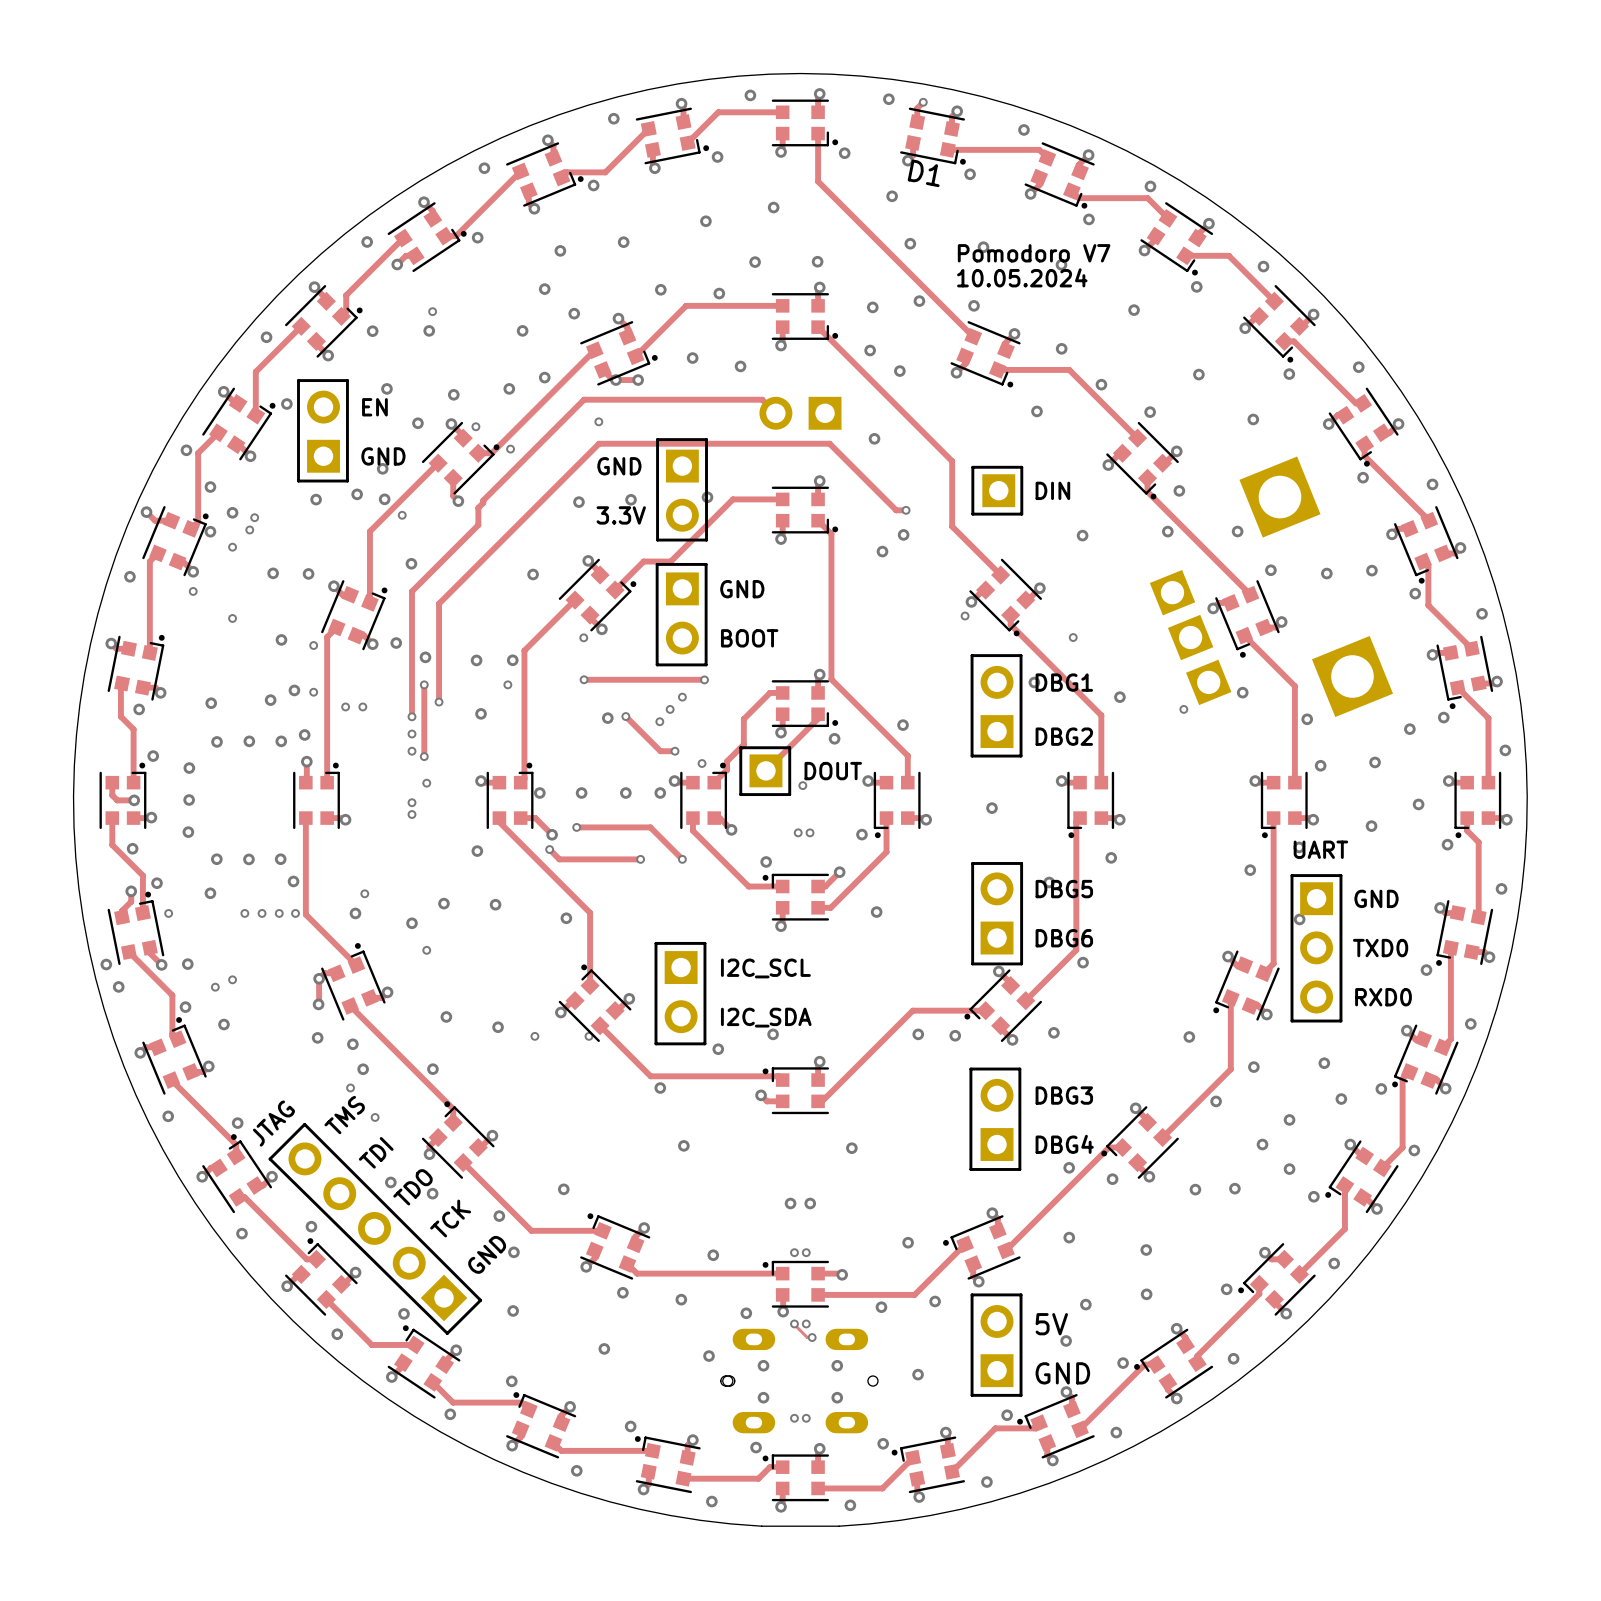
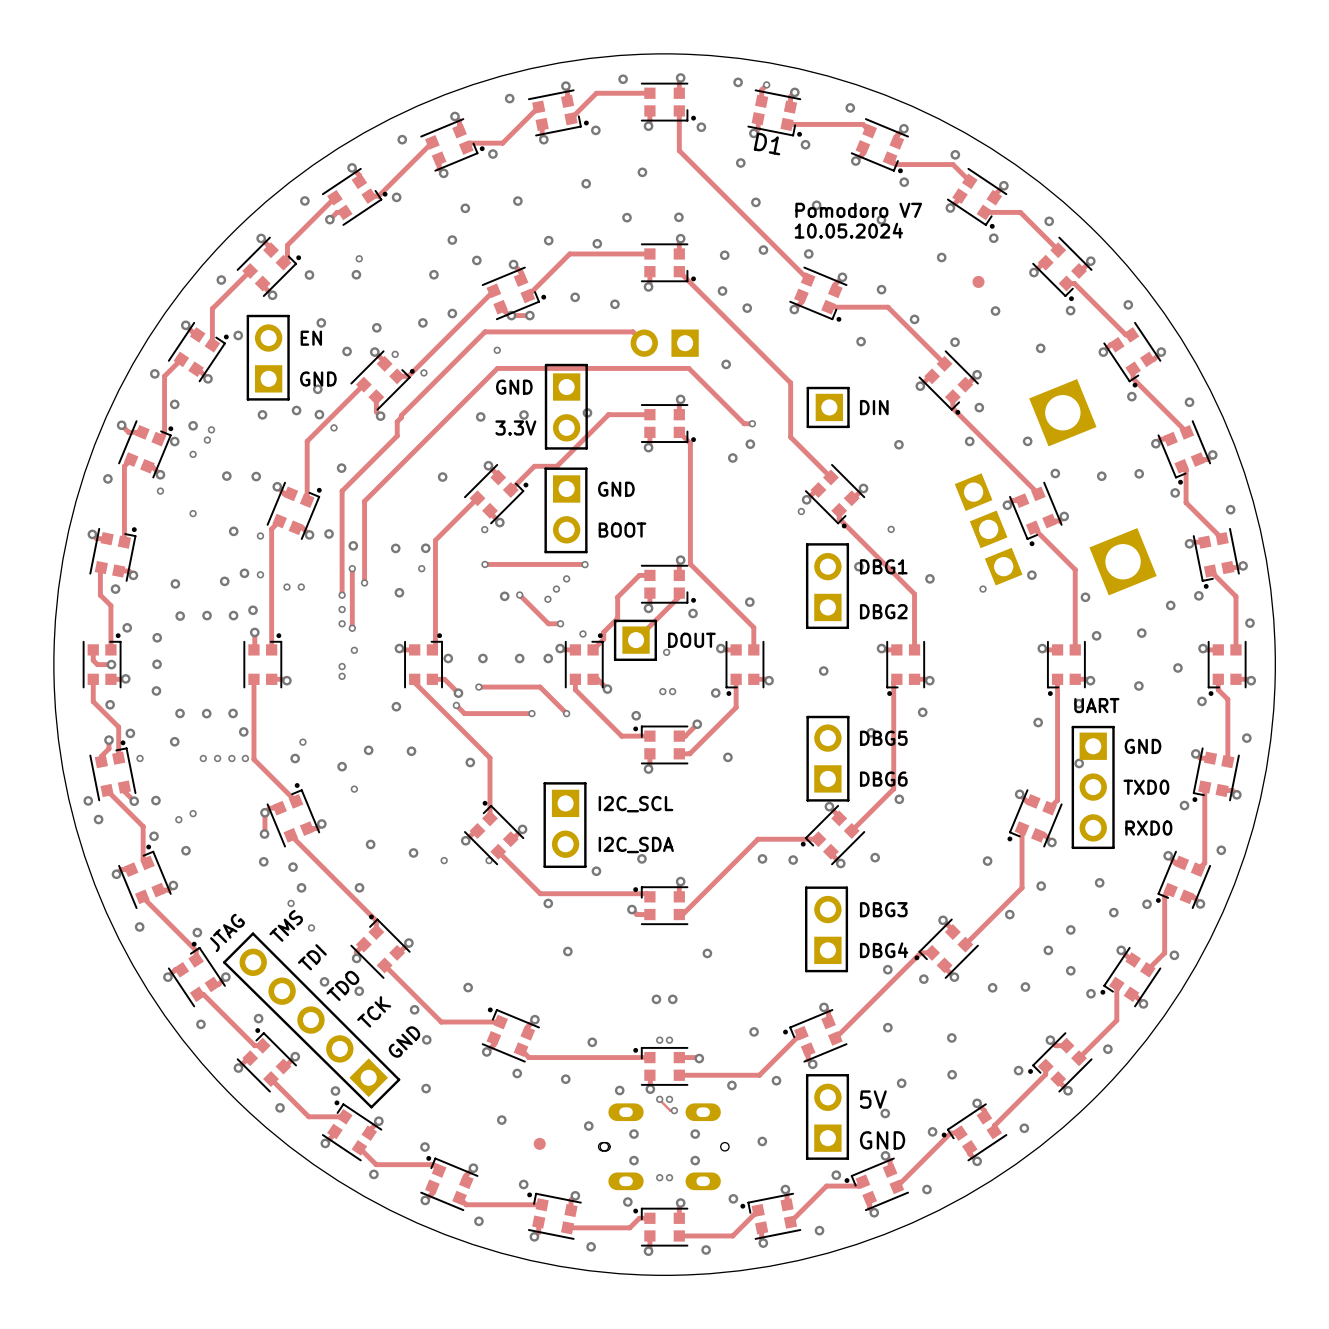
round board edge: none -> [53, 53, 1276, 1276]
part: none -> (978, 281)
part: none -> (539, 1143)
board edge: (761, 1526) (839, 1526) (900, 1520) (960, 1509) (1049, 1483) (1106, 1459) (1187, 1415) (1237, 1380) (1285, 1341) (1349, 1276) (1388, 1228) (1422, 1176) (1451, 1122) (1487, 1037) (1504, 979) (1521, 888) (1526, 827) (1526, 765) (1516, 674) (1502, 613) (1484, 555) (1448, 470) (1417, 417) (1383, 366) (1344, 318) (1301, 274) (1255, 233) (1180, 180) (1126, 150) (1070, 125) (982, 96) (922, 83) (831, 74) (769, 74) (677, 83) (617, 96) (559, 114) (501, 137) (420, 180) (345, 233) (298, 274) (236, 342) (199, 391) (167, 443) (139, 498) (106, 584) (90, 643) (79, 704) (74, 765) (74, 827) (78, 888) (95, 979) (113, 1037) (135, 1095) (178, 1176) (231, 1252) (271, 1299) (338, 1361) (388, 1398) (440, 1431) (494, 1459) (551, 1483) (639, 1509) (700, 1520) (761, 1526) -> none

